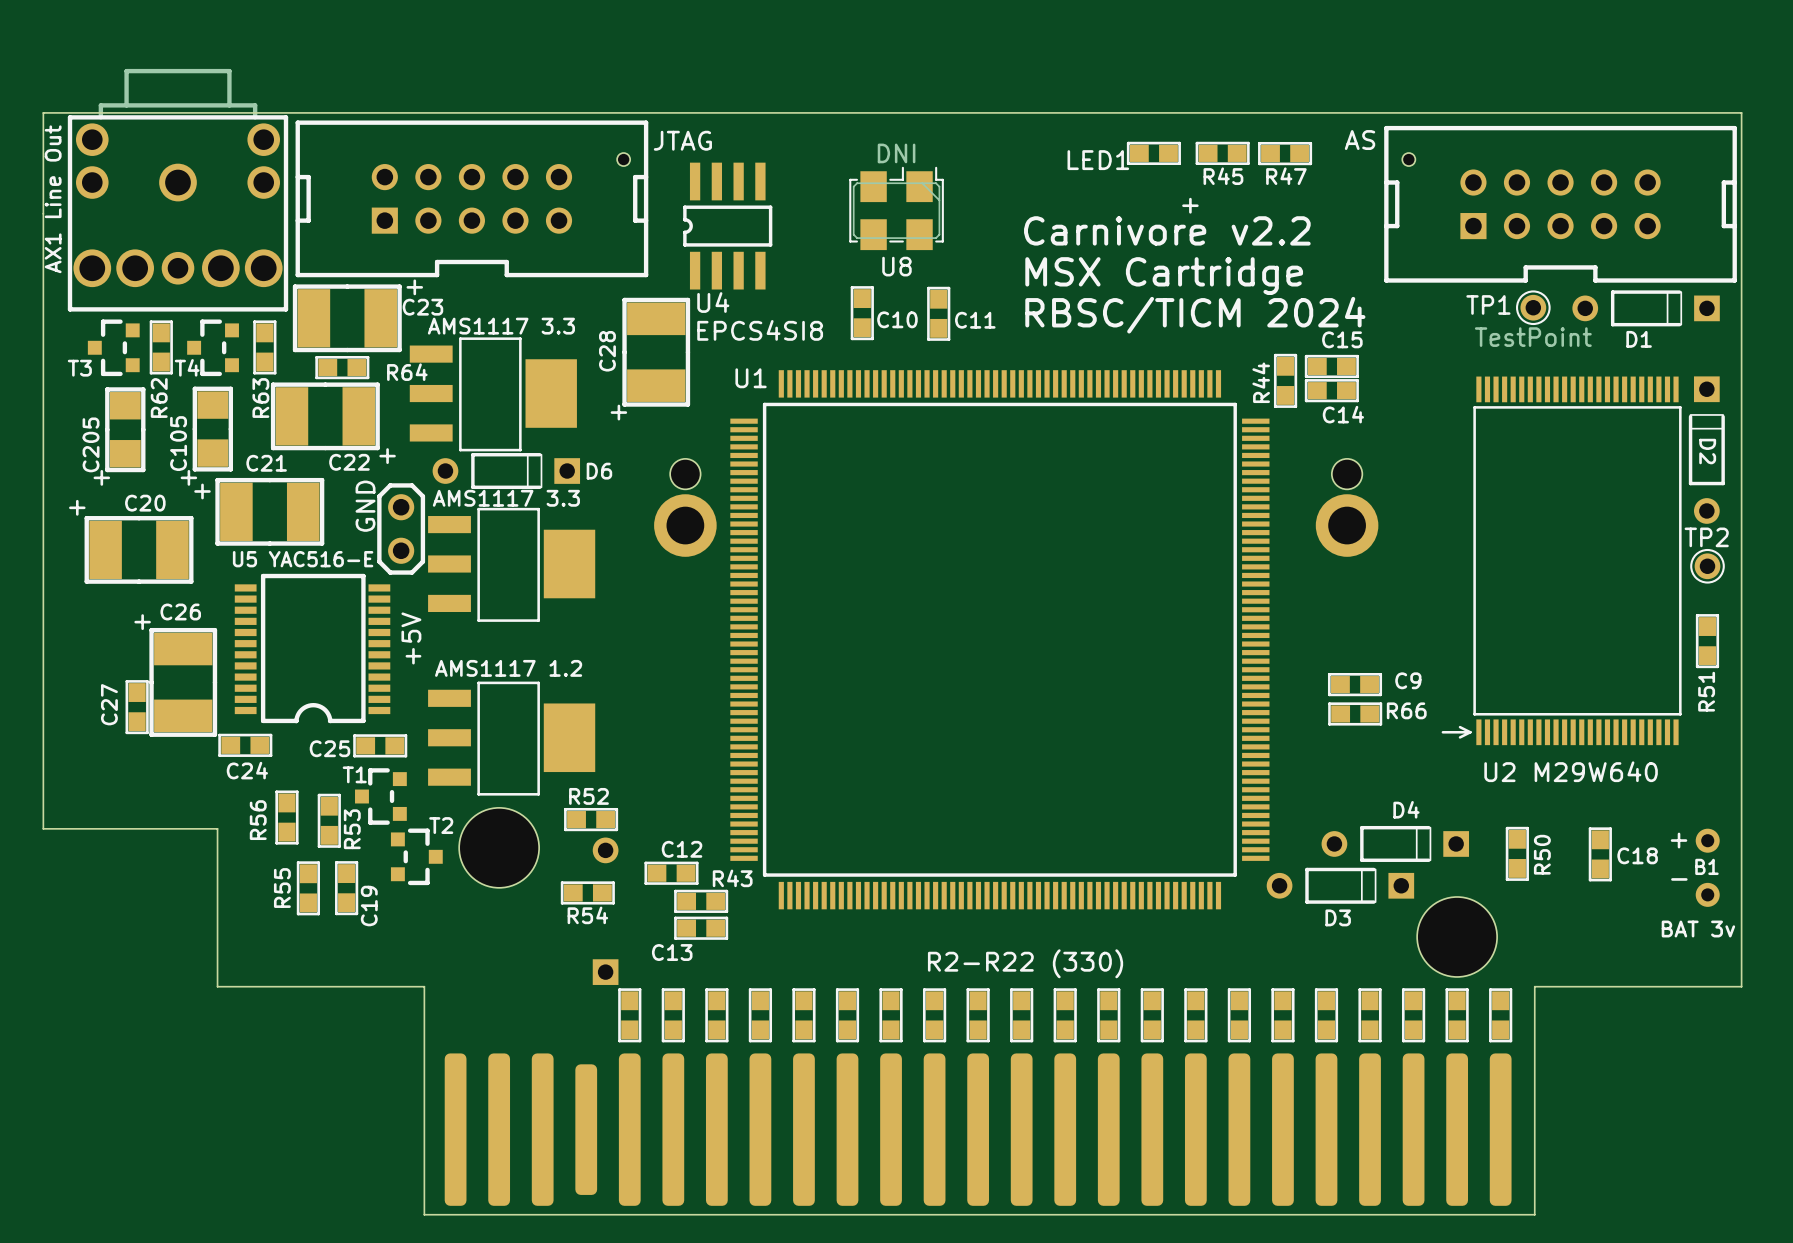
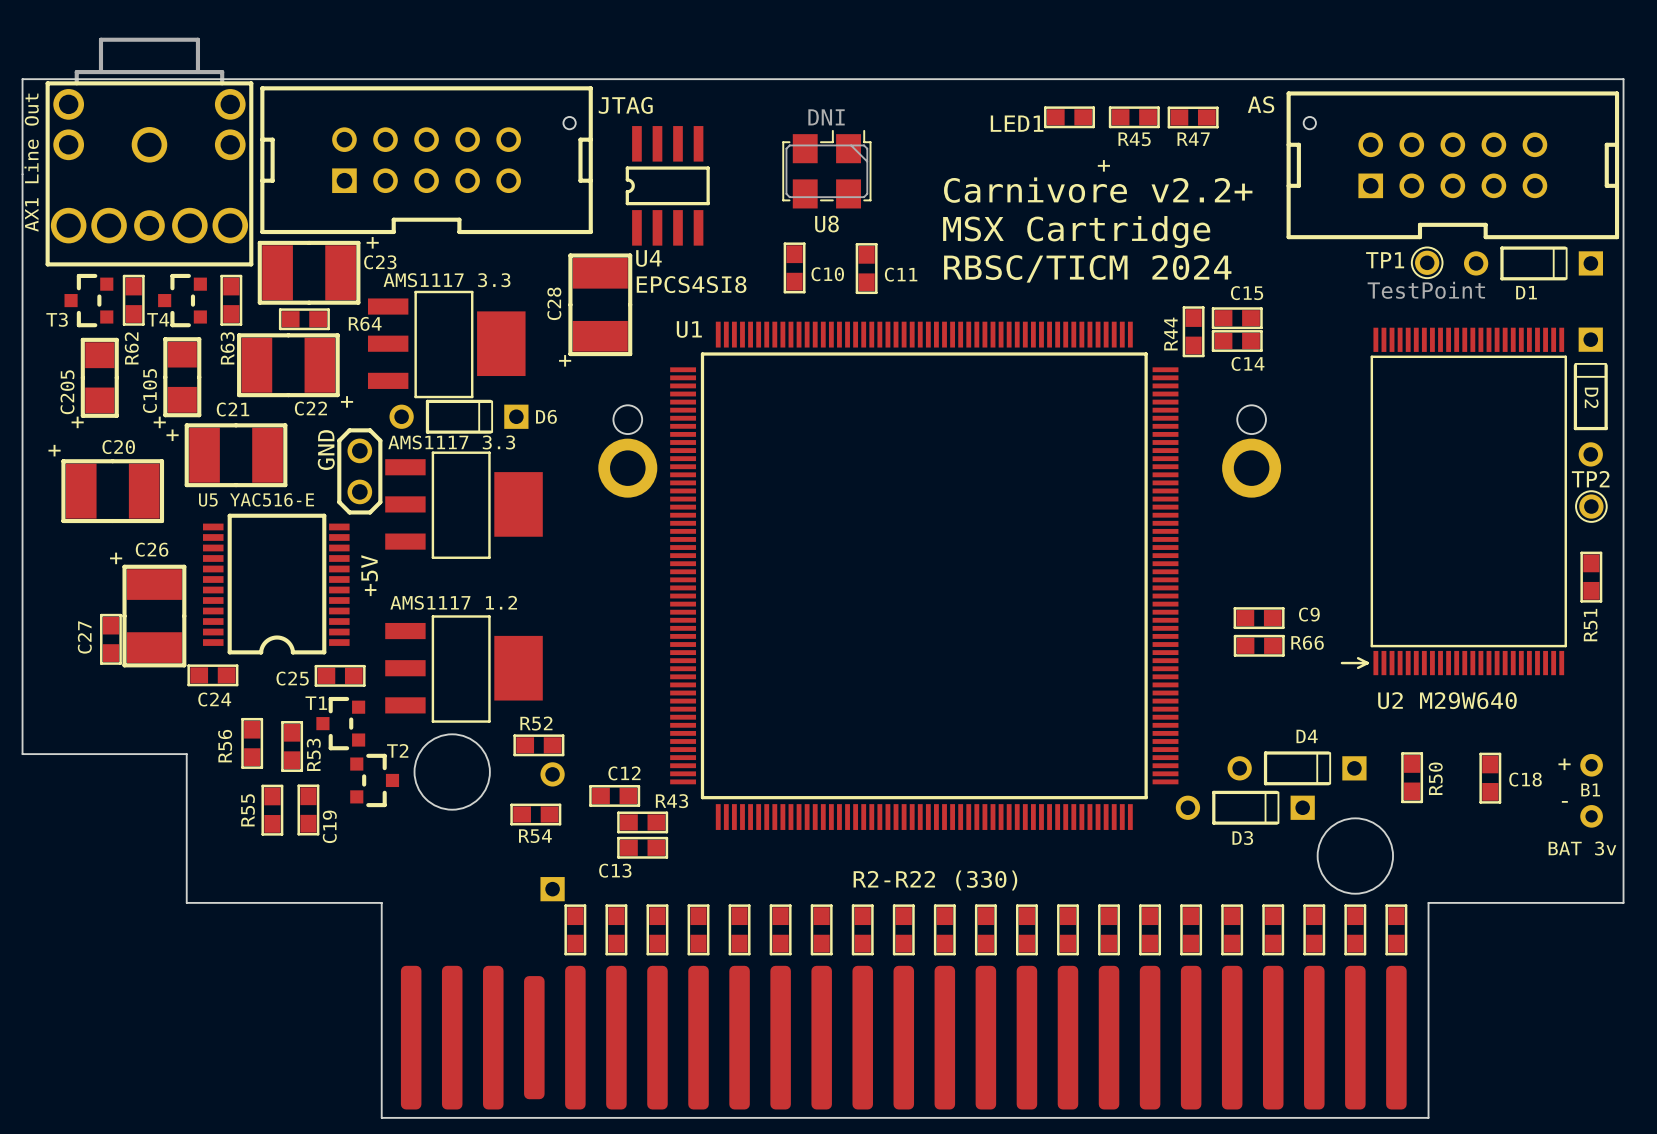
text: Carnivore v2.2 (1167, 230) -> Carnivore v2.2+ (1098, 190)

